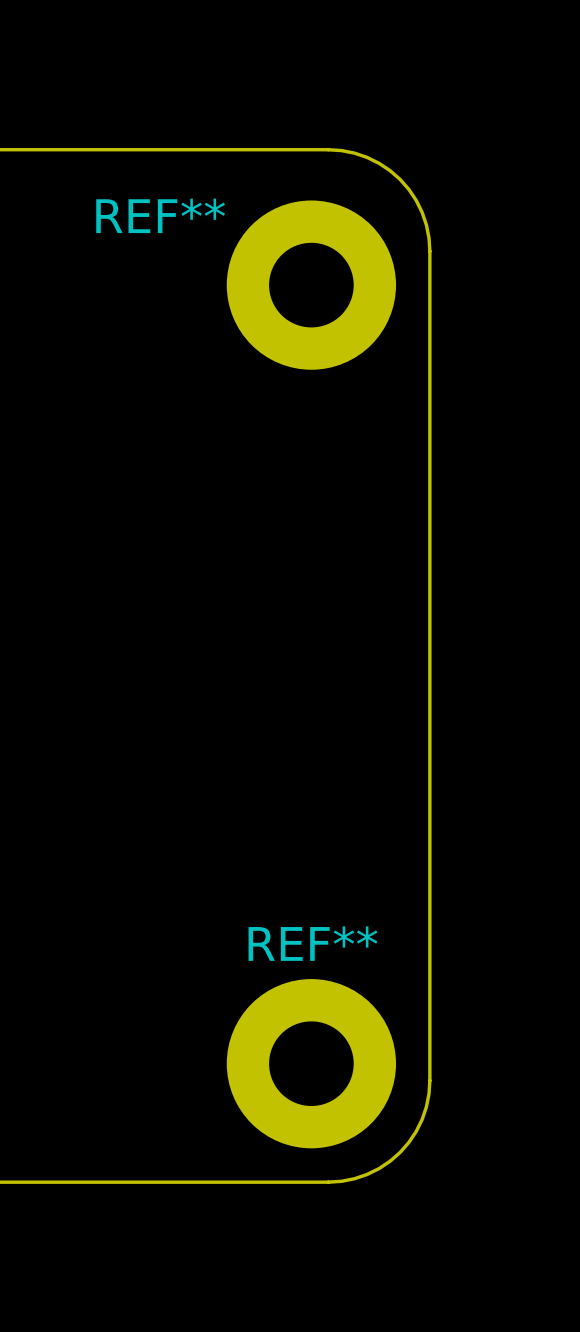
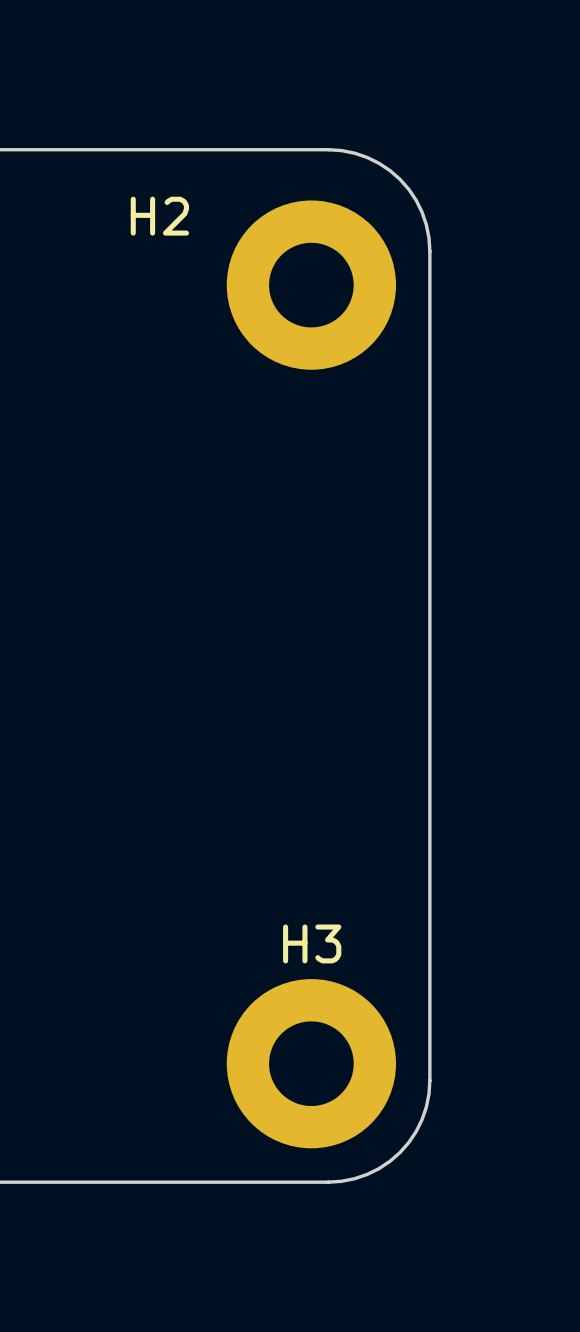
REF** name: REF** (160, 215) -> H2 (159, 216)
REF** name: REF** (312, 943) -> H3 (312, 943)

